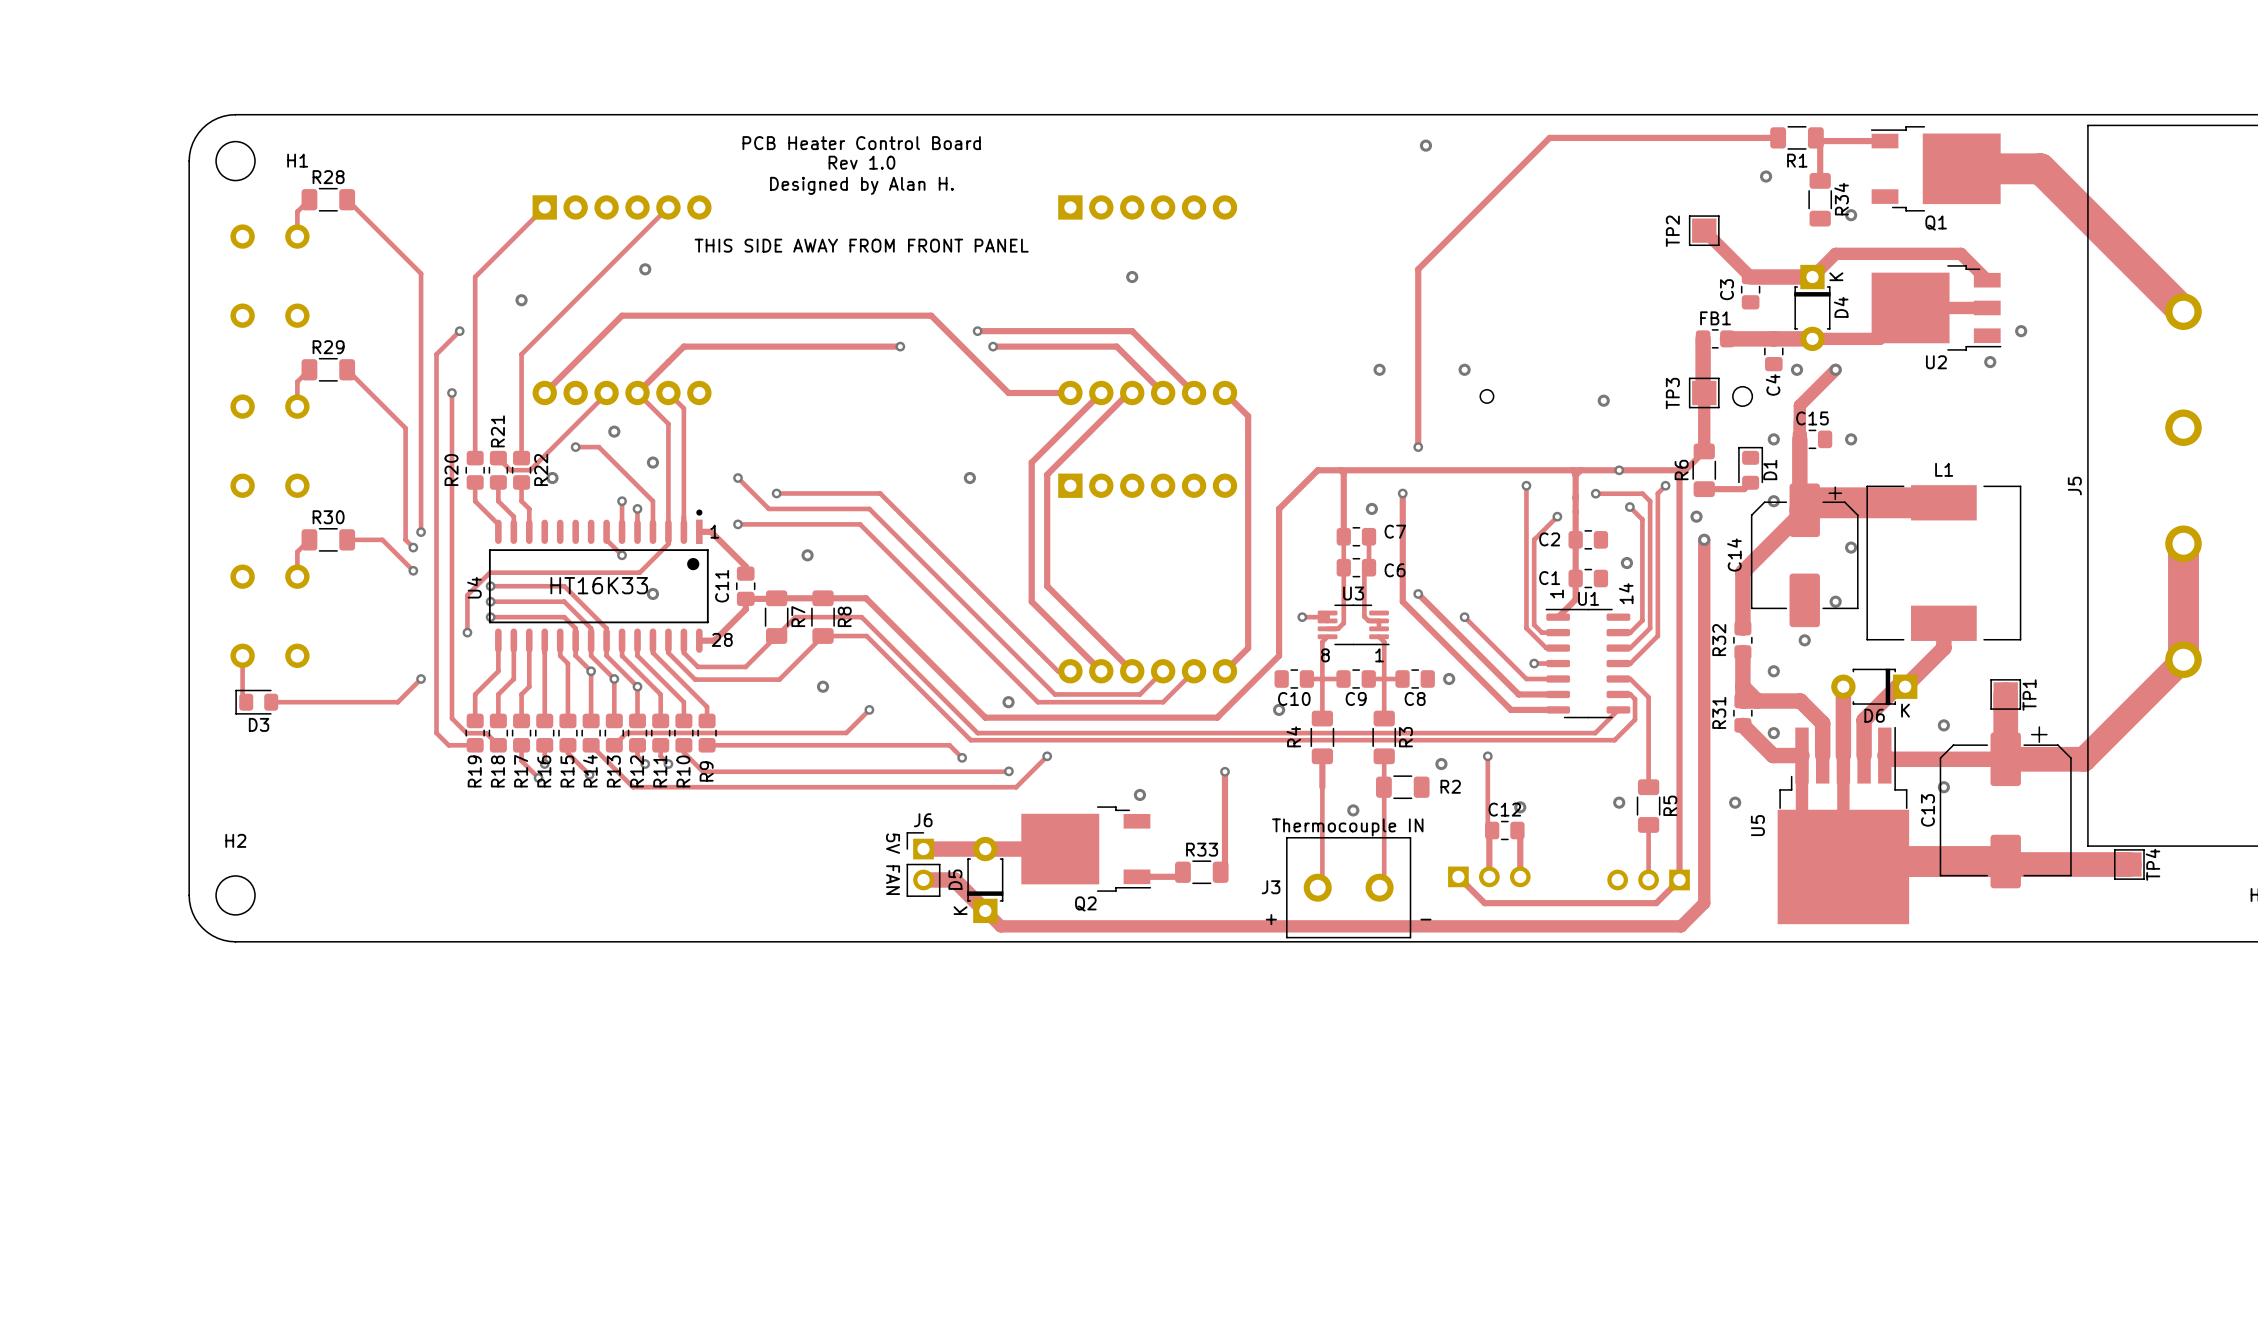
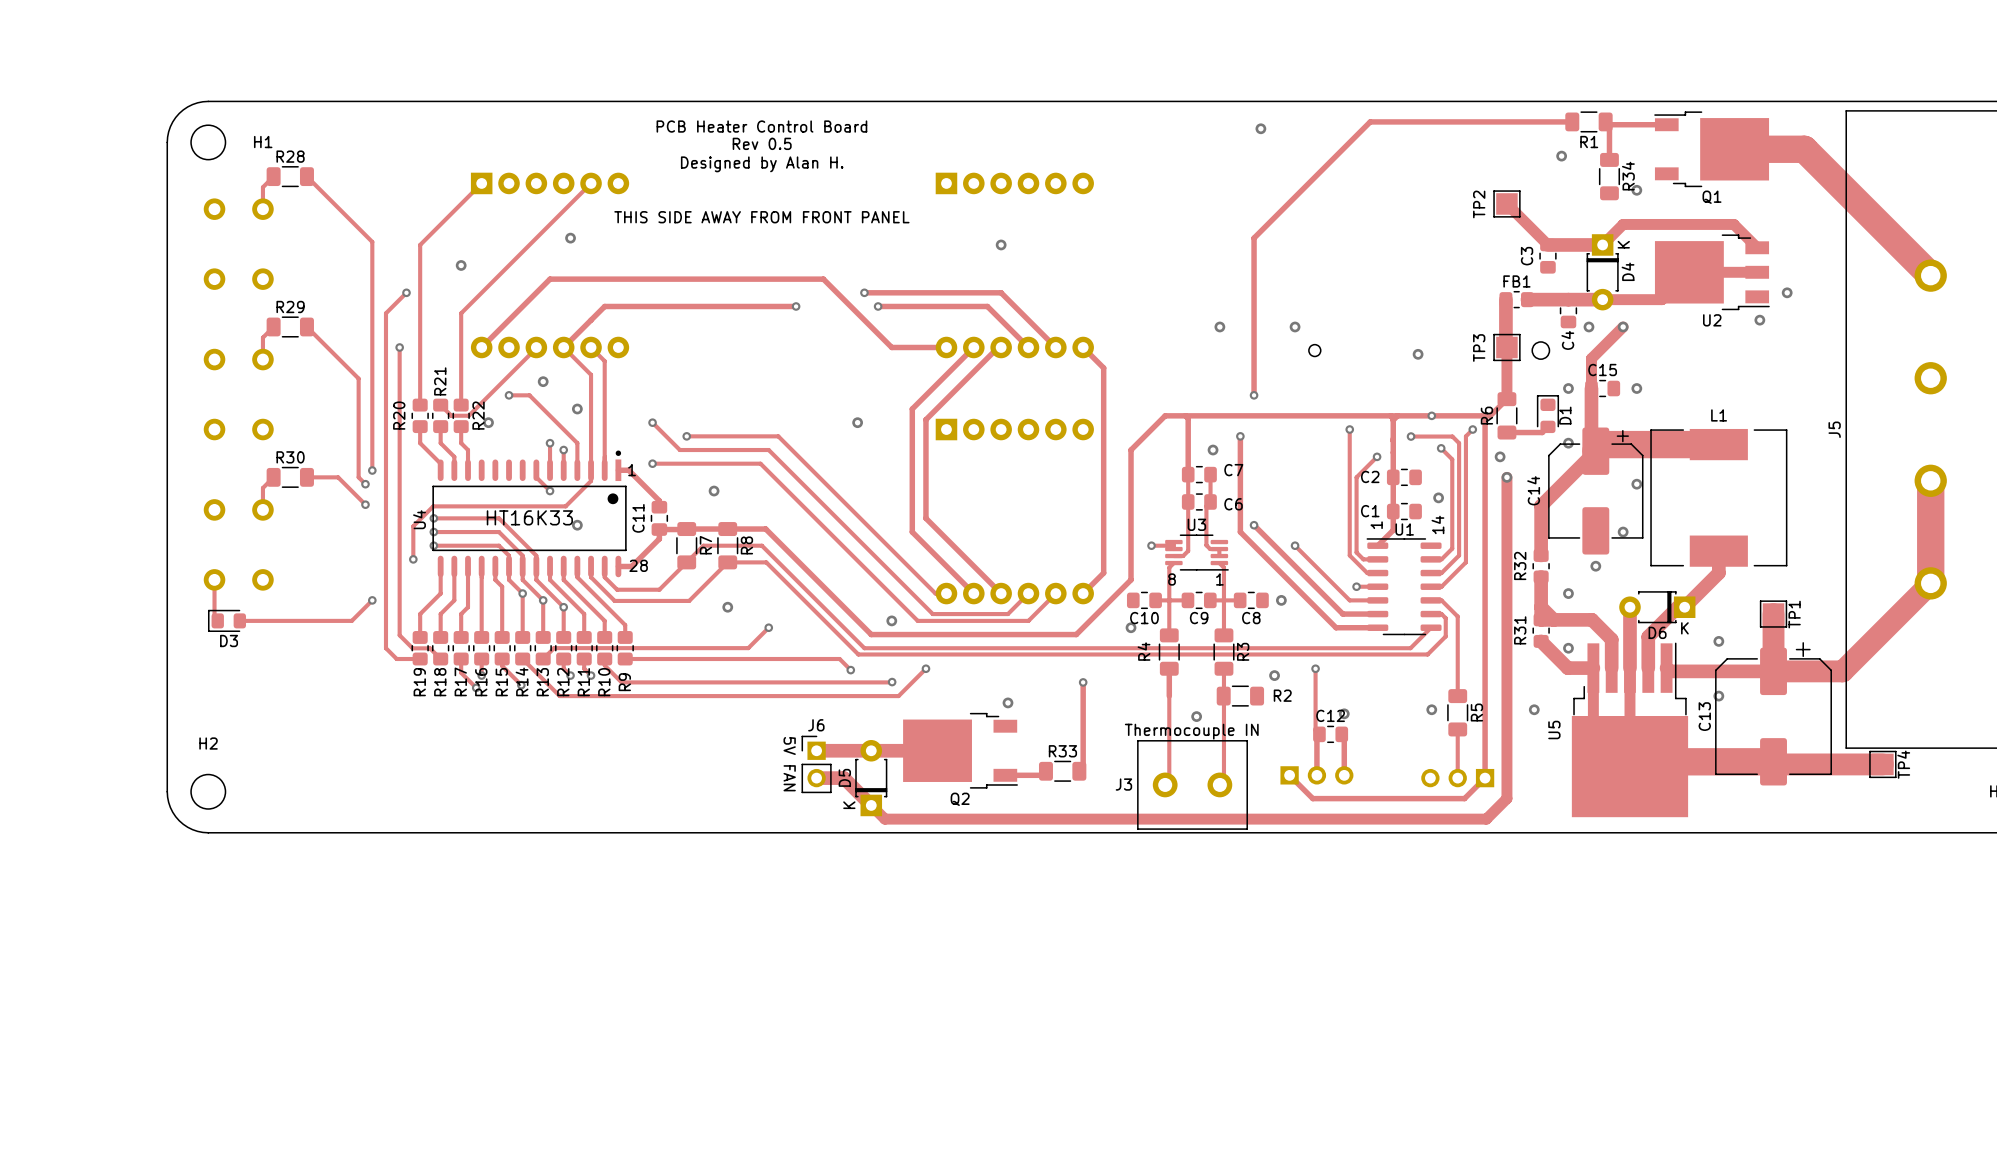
text: Rev 1.0 (861, 162) -> Rev 0.5 (762, 143)
text: + (1271, 919) -> none
text: - (1425, 919) -> none

